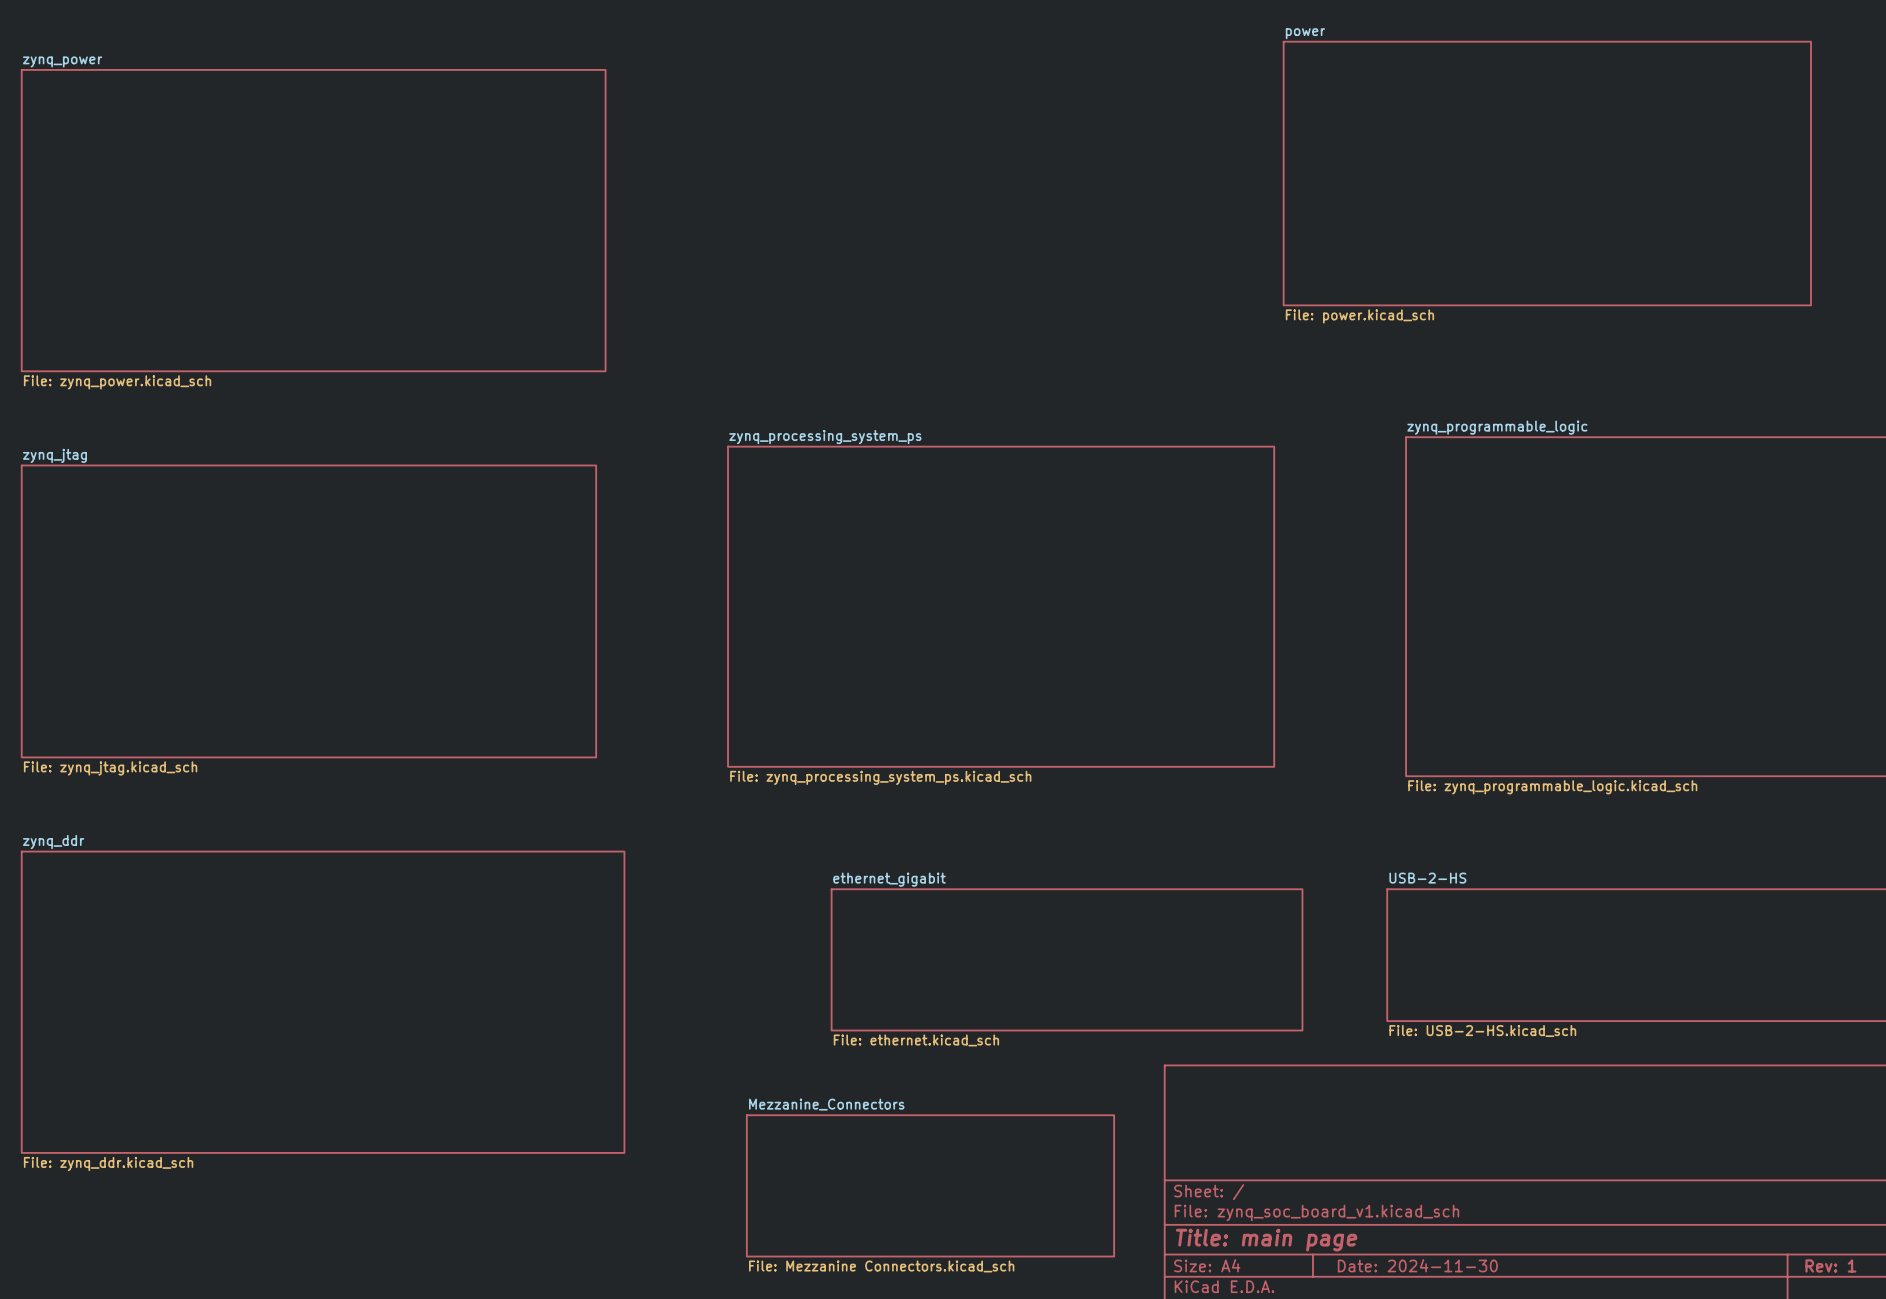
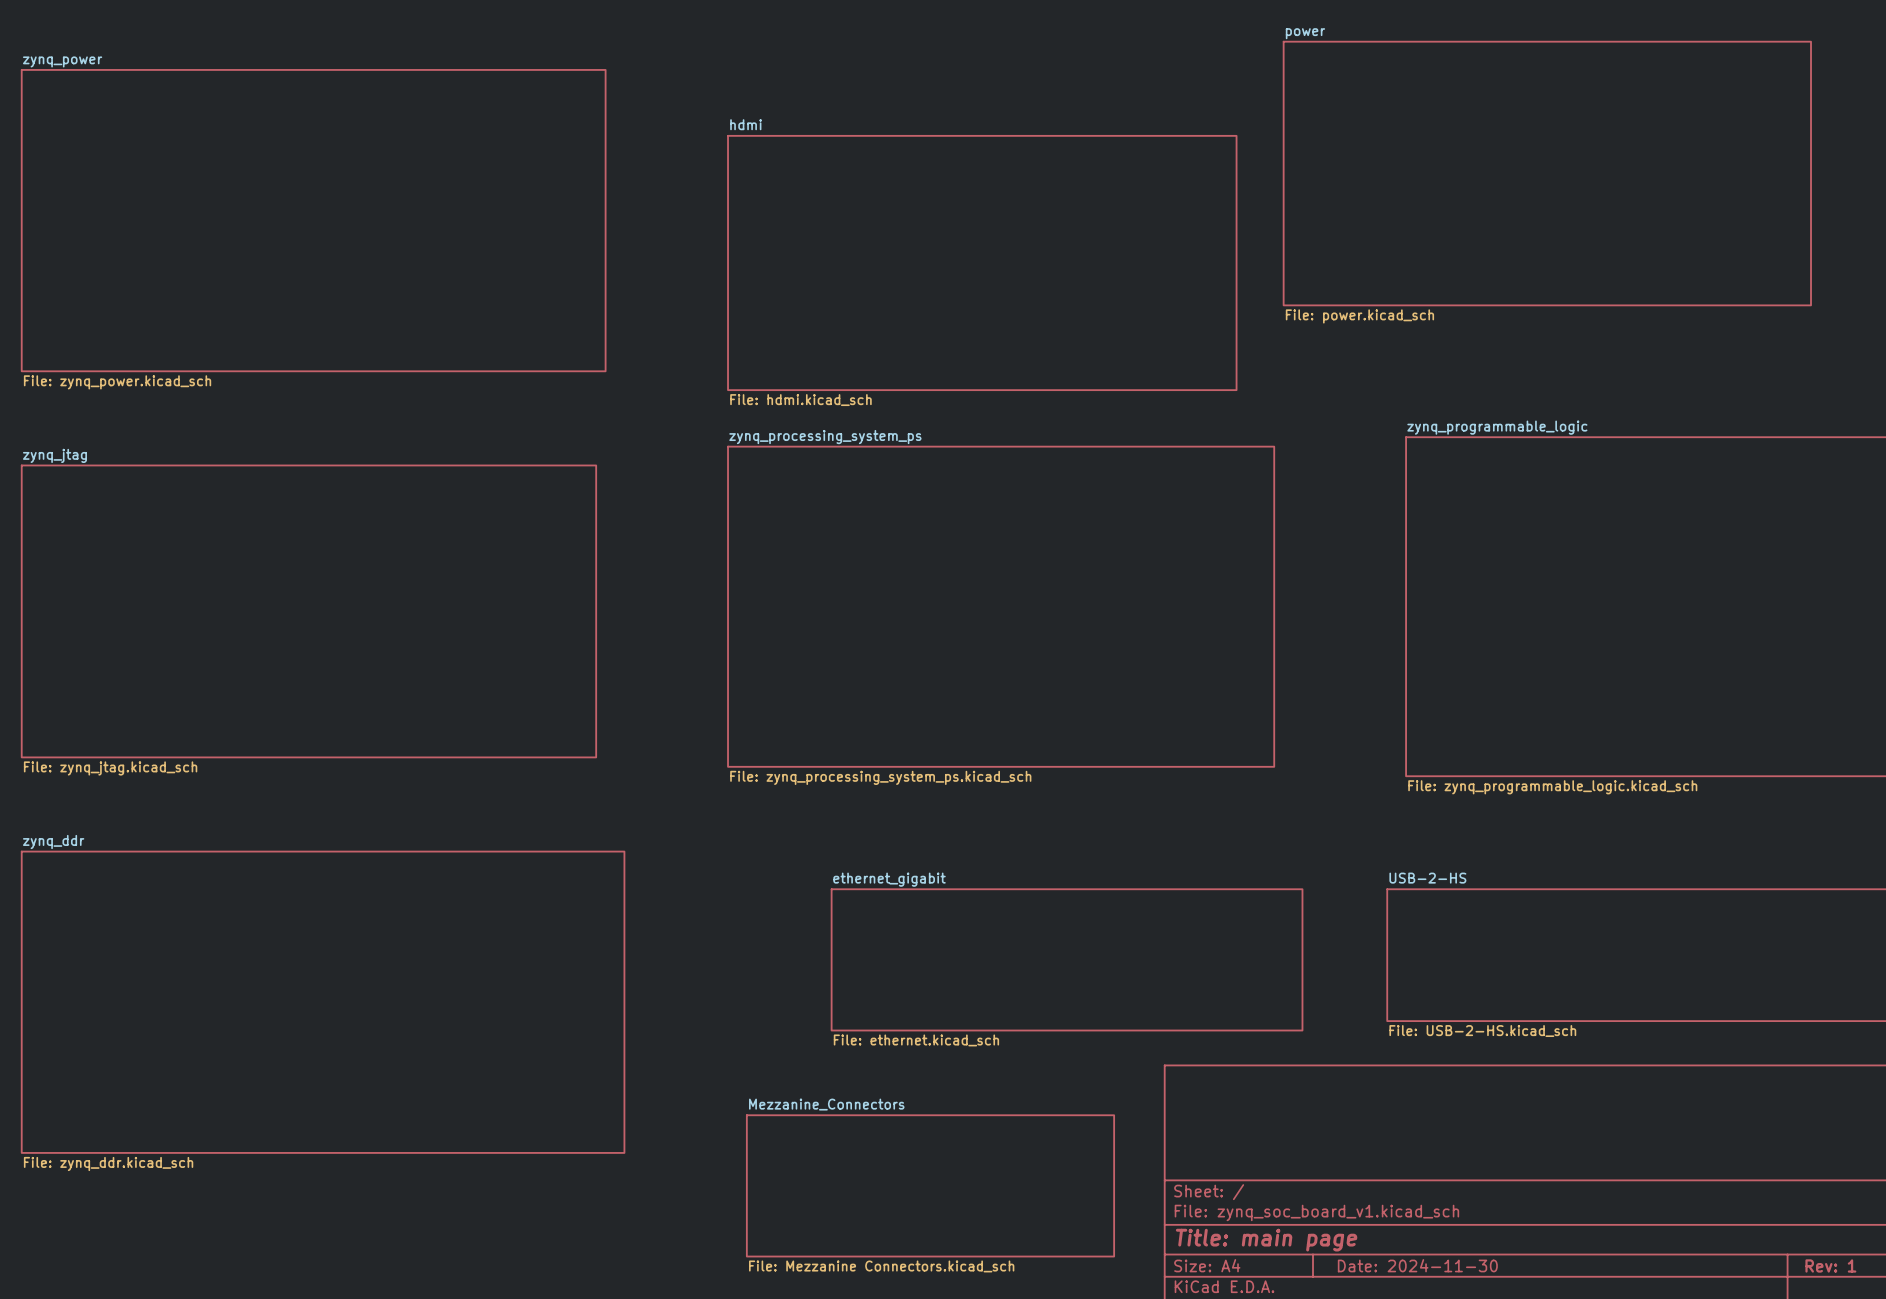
sheet hdmi: none -> File: hdmi.kicad_sch (982, 263)

